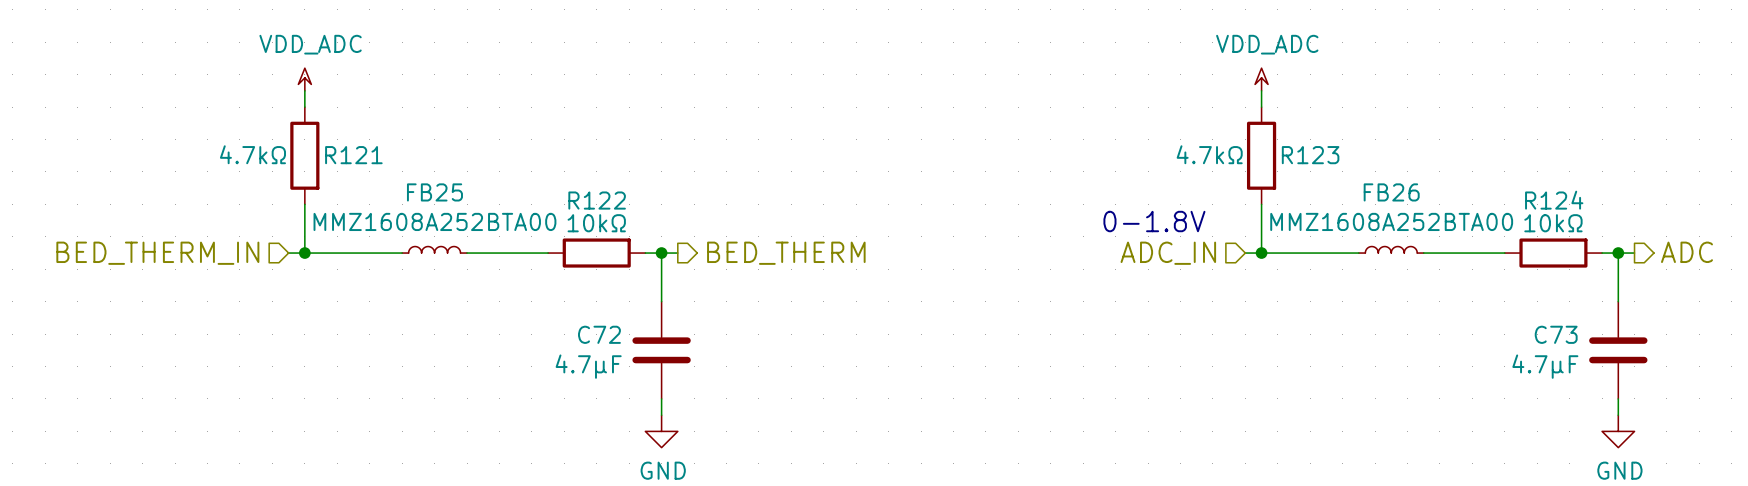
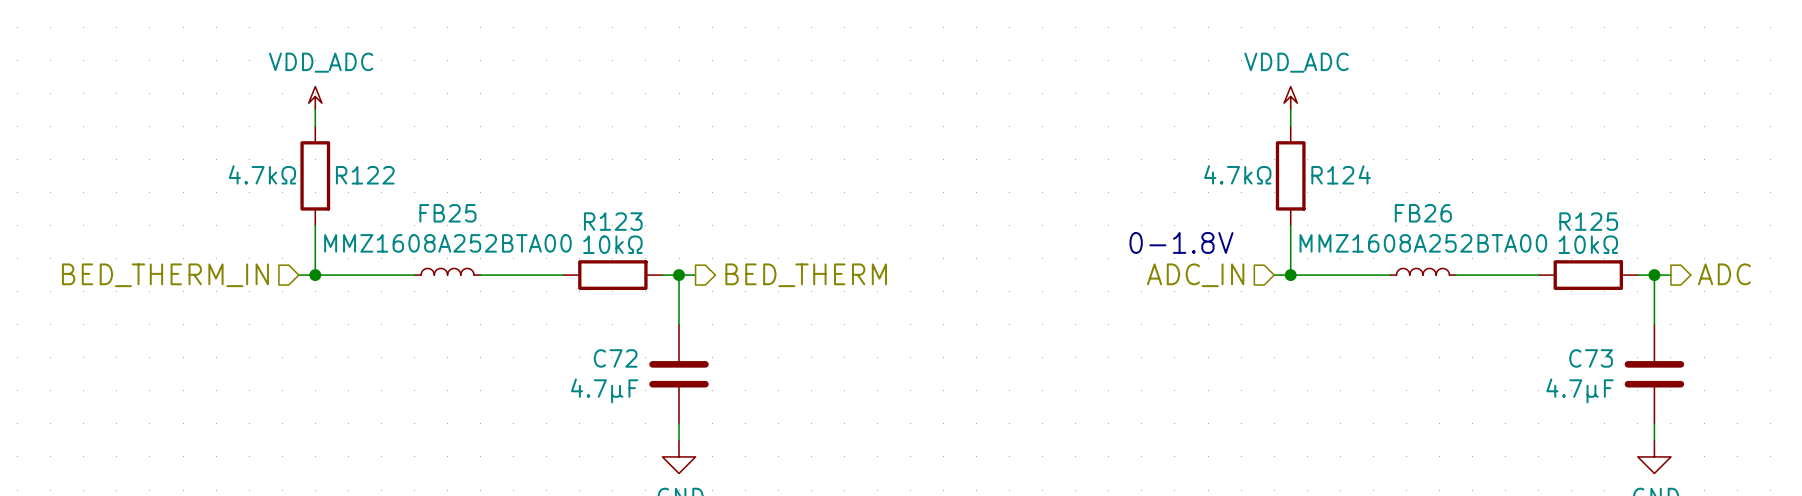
R121 name: R121 (353, 155) -> R122 (365, 175)
R123 name: R123 (1310, 155) -> R124 (1341, 174)
R122 name: R122 (597, 200) -> R123 (613, 221)
R124 name: R124 (1554, 200) -> R125 (1588, 221)

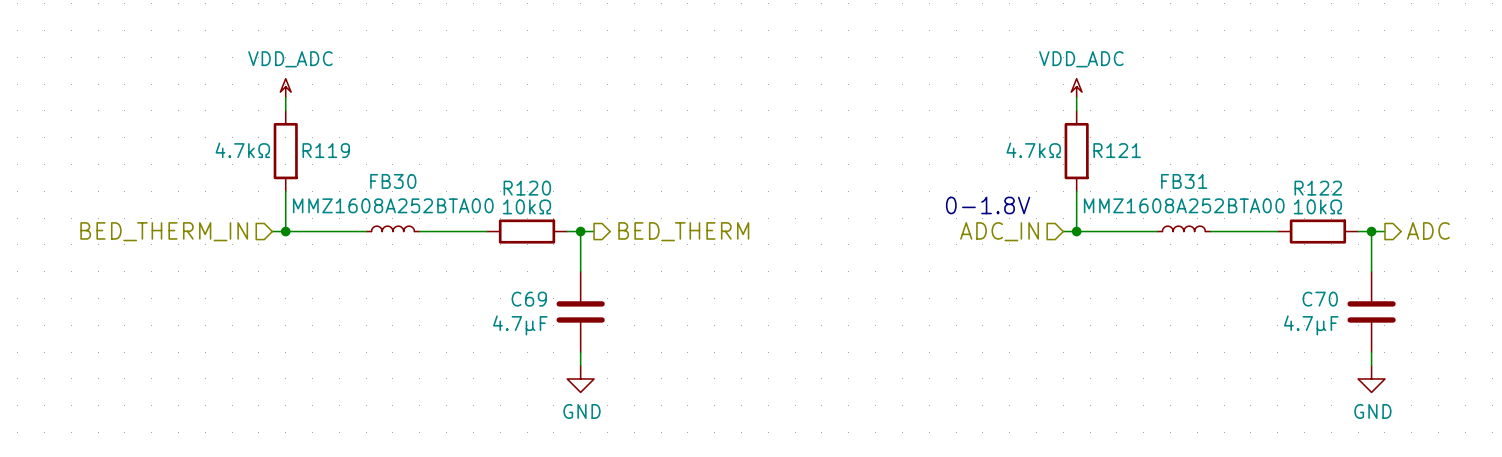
R124 name: R124 (1341, 174) -> R121 (1117, 150)
R122 name: R122 (365, 175) -> R119 (326, 150)
FB25 name: FB25 (447, 213) -> FB30 (393, 181)
FB26 name: FB26 (1423, 213) -> FB31 (1184, 181)
R123 name: R123 (613, 221) -> R120 (527, 188)
R125 name: R125 (1588, 221) -> R122 (1318, 188)
C72 name: C72 (615, 358) -> C69 (529, 299)
C73 name: C73 (1591, 358) -> C70 (1320, 299)

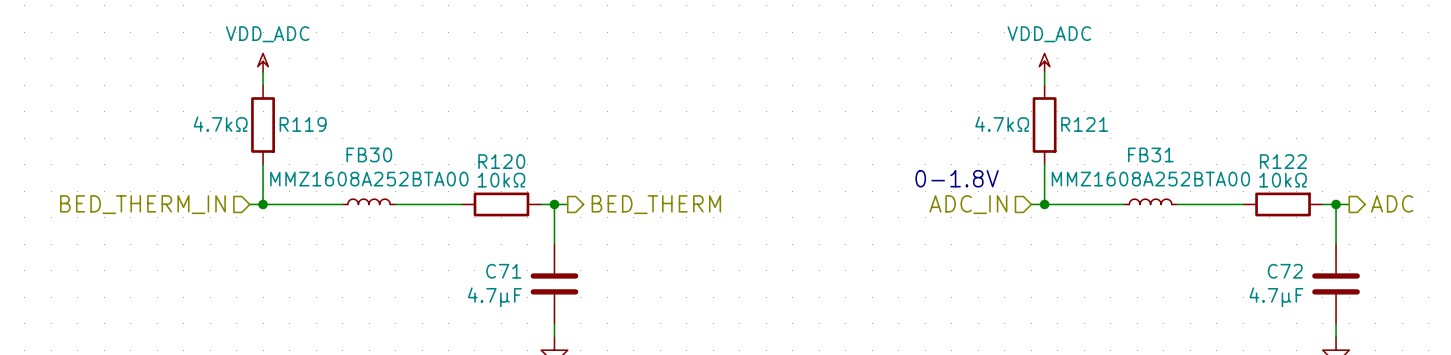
C69 name: C69 (529, 299) -> C71 (503, 271)
C70 name: C70 (1320, 299) -> C72 (1285, 271)

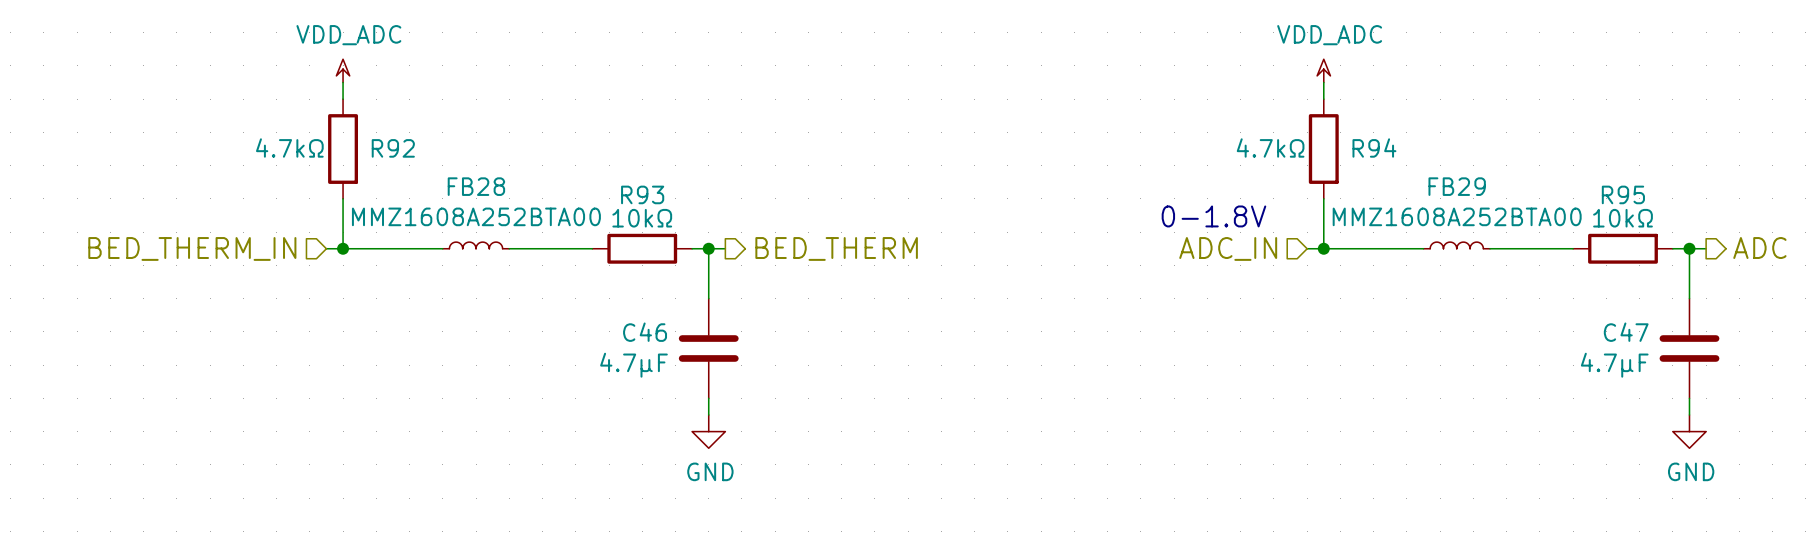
R119 name: R119 (303, 124) -> R92 (393, 148)
R121 name: R121 (1084, 124) -> R94 (1374, 148)
FB30 name: FB30 (369, 154) -> FB28 (476, 186)
FB31 name: FB31 (1150, 154) -> FB29 (1457, 186)
R120 name: R120 (501, 161) -> R93 (642, 194)
R122 name: R122 (1283, 161) -> R95 (1623, 194)
C71 name: C71 (503, 271) -> C46 (645, 332)
C72 name: C72 (1285, 271) -> C47 (1626, 332)

